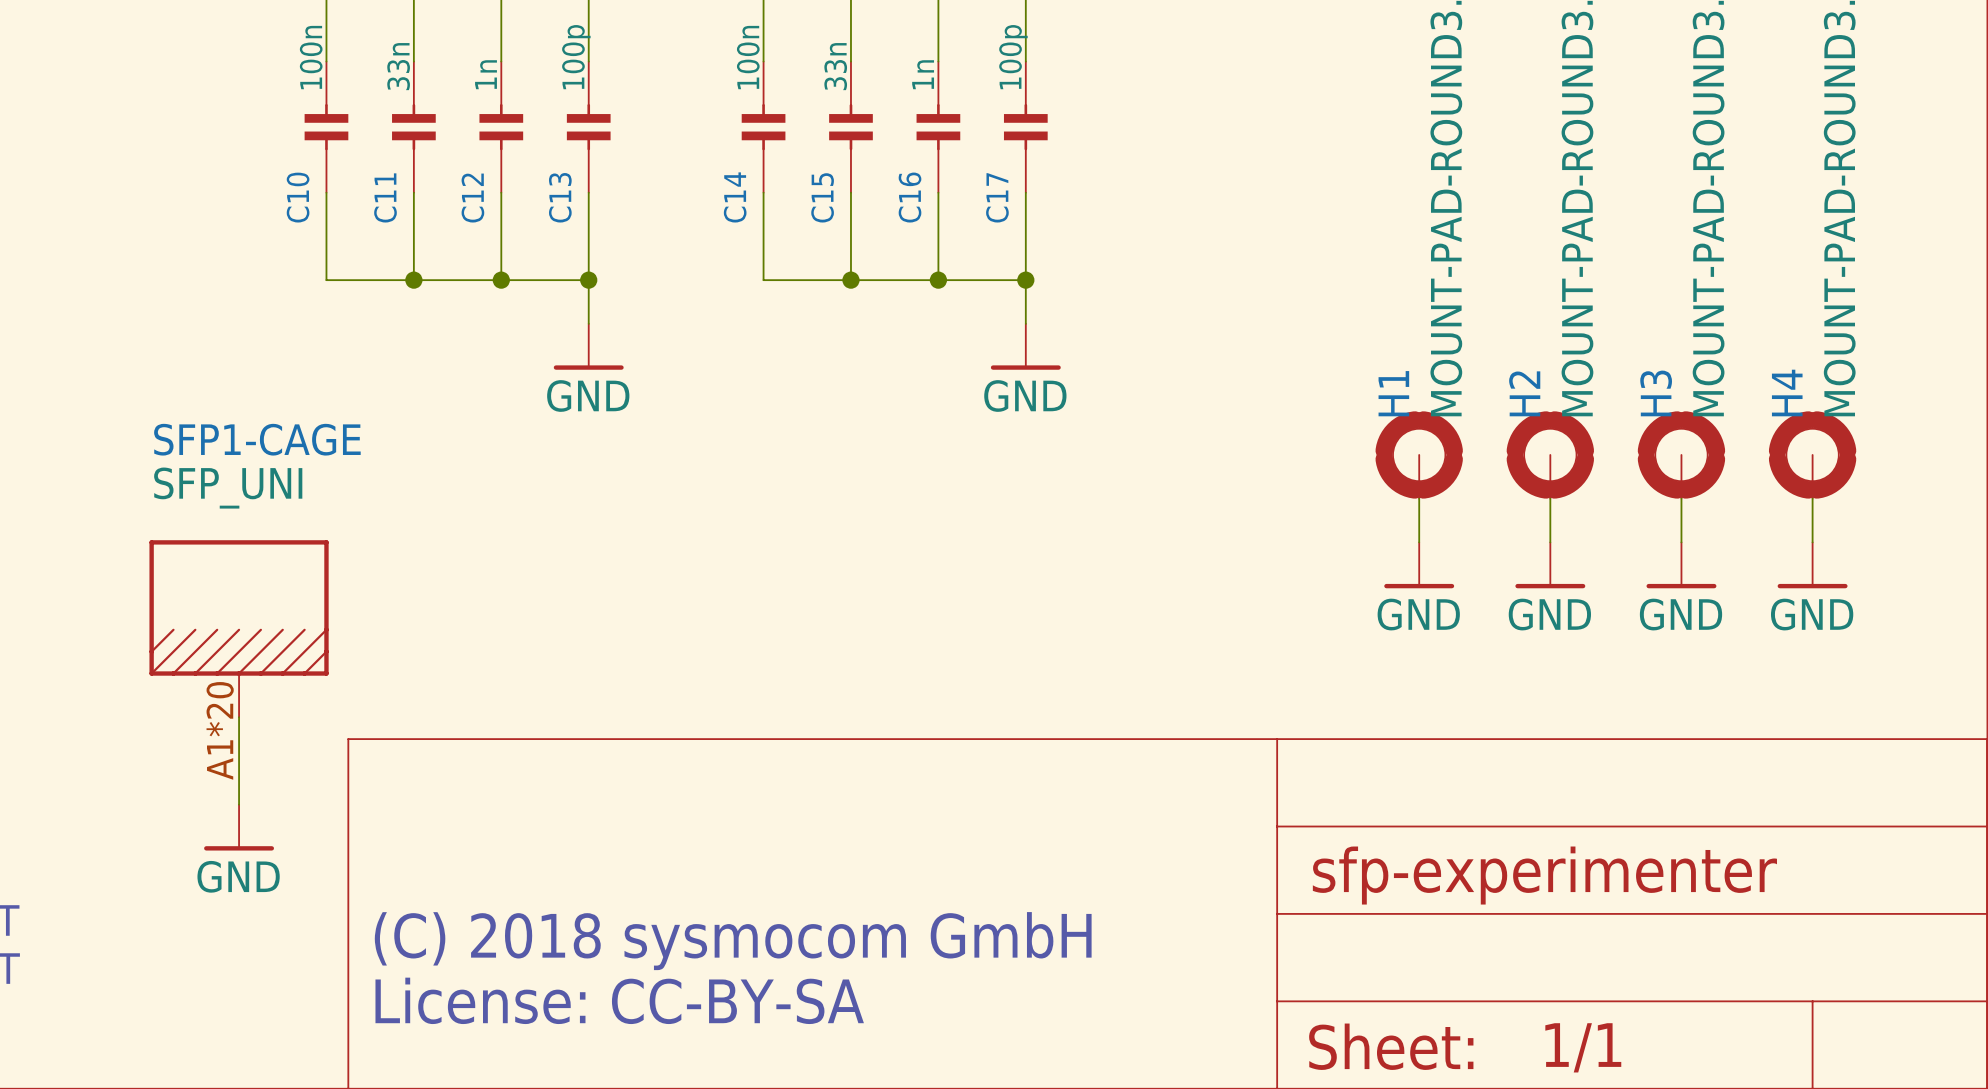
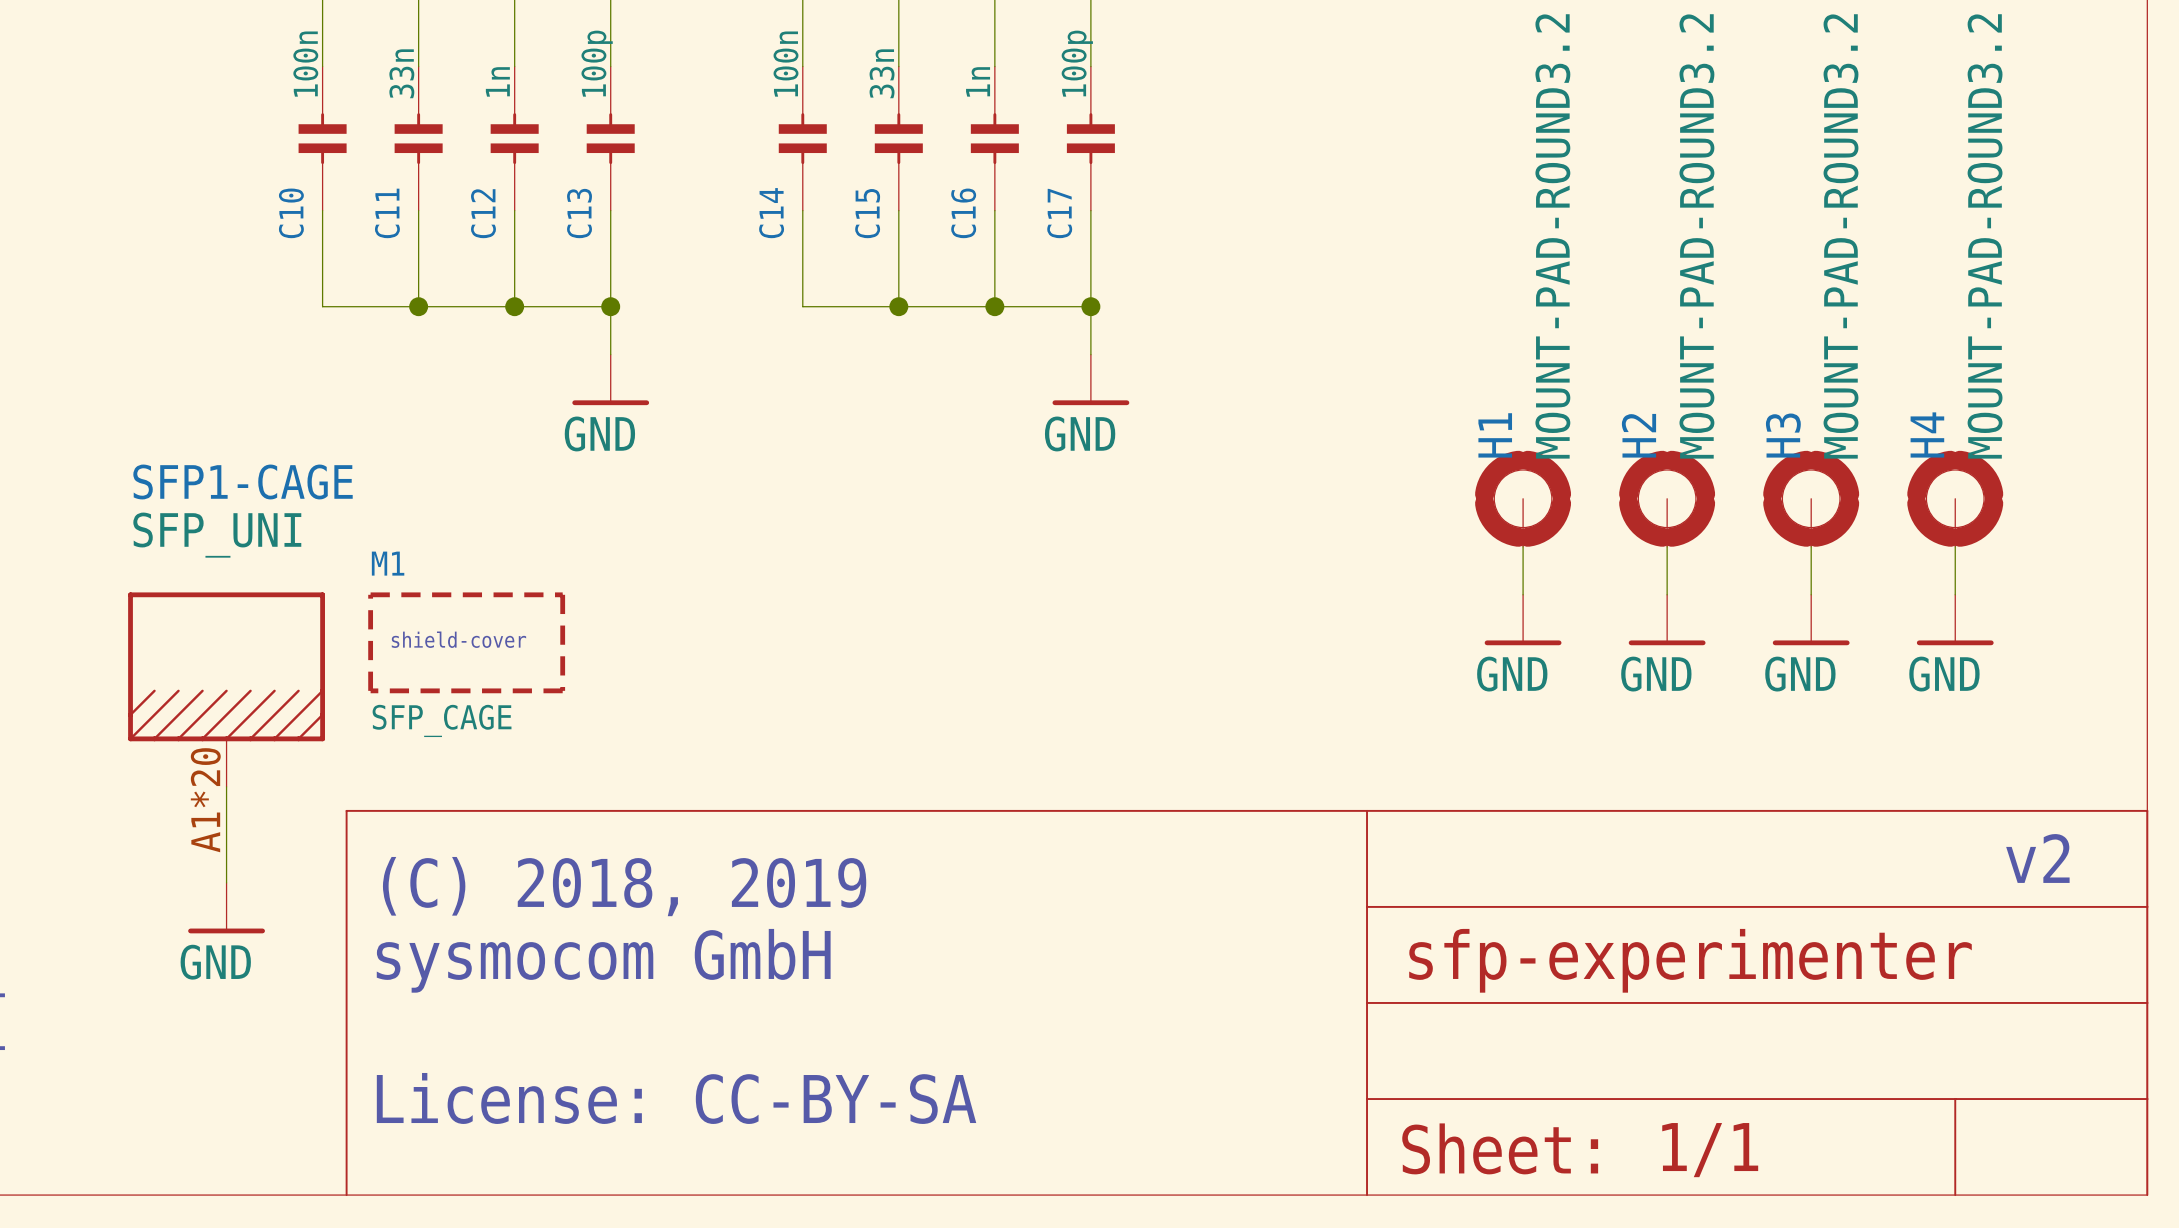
M1: none -> SFP_CAGE (466, 642)
text: none -> v2 (2037, 858)
text: none -> (C) 2018, 2019 (624, 886)
text: (C) 2018 sysmocom GmbH (733, 941) -> sysmocom GmbH (603, 960)

